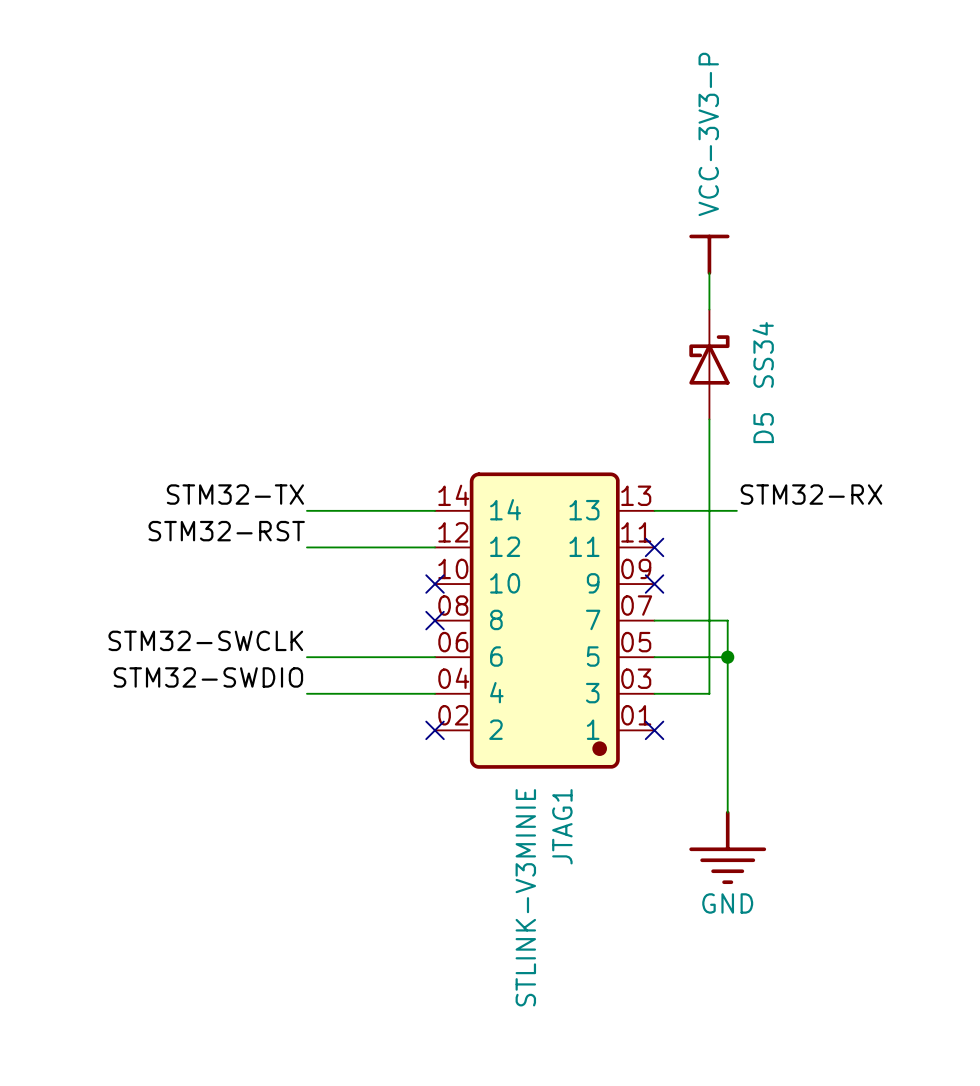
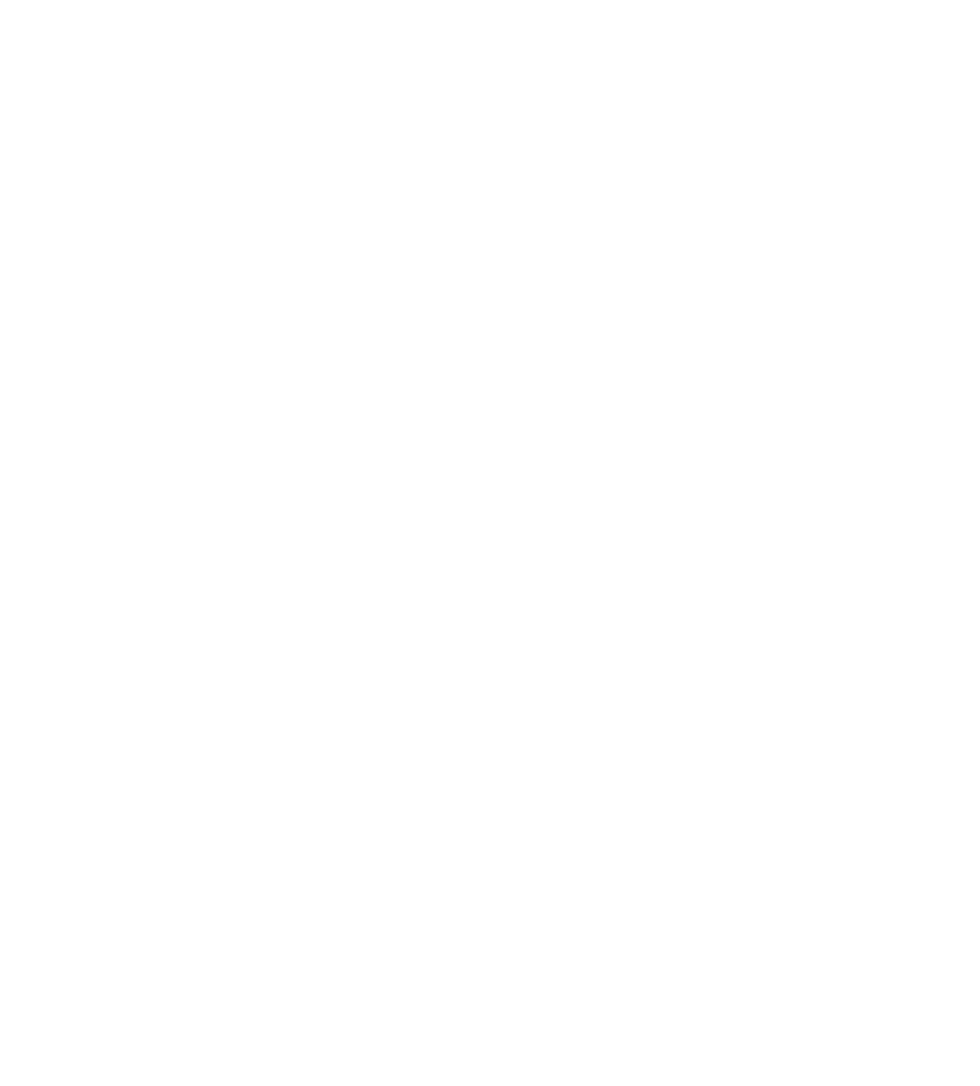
power symbol: VCC-3V3-P (709, 254) -> none
wire: (709, 273) (709, 309) -> none
D5: SS34 (709, 364) -> none
wire: (709, 419) (709, 693) (654, 693) -> none
label: STM32-TX (235, 494) -> none
label: STM32-RX (811, 494) -> none
wire: (306, 510) (435, 510) -> none
wire: (654, 510) (736, 510) -> none
label: STM32-RST (226, 531) -> none
wire: (306, 547) (435, 547) -> none
no-connect mark: (654, 547) -> none
no-connect mark: (435, 584) -> none
no-connect mark: (654, 584) -> none
no-connect mark: (435, 620) -> none
JTAG1: STLINK-V3MINIE (544, 620) -> none
wire: (654, 620) (727, 620) (727, 812) -> none
label: STM32-SWCLK (205, 640) -> none
wire: (306, 657) (435, 657) -> none
wire: (654, 657) (727, 657) -> none
junction: (727, 657) -> none
label: STM32-SWDIO (208, 677) -> none
wire: (306, 693) (435, 693) -> none
no-connect mark: (435, 730) -> none
no-connect mark: (654, 730) -> none
power symbol: GND (727, 847) -> none

